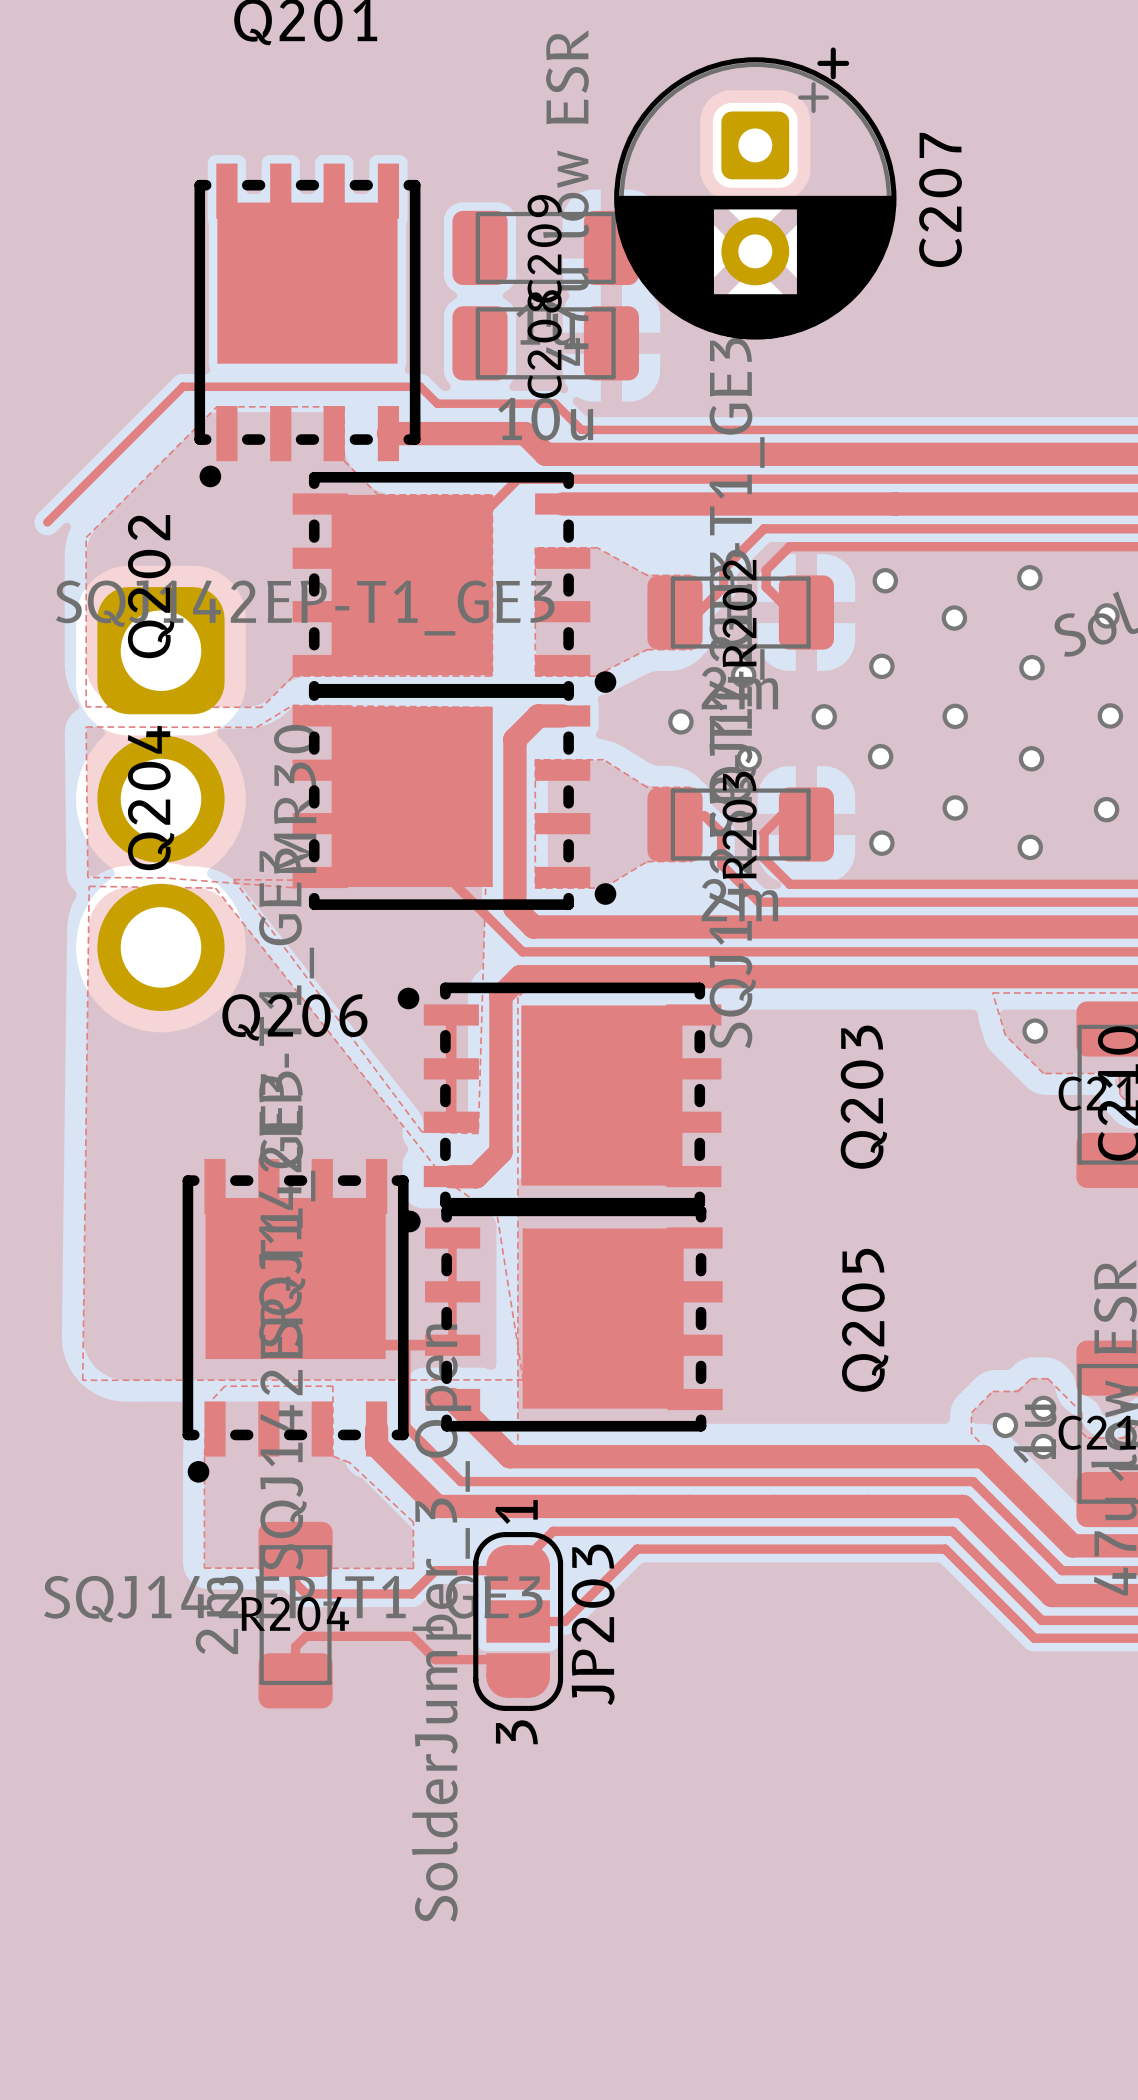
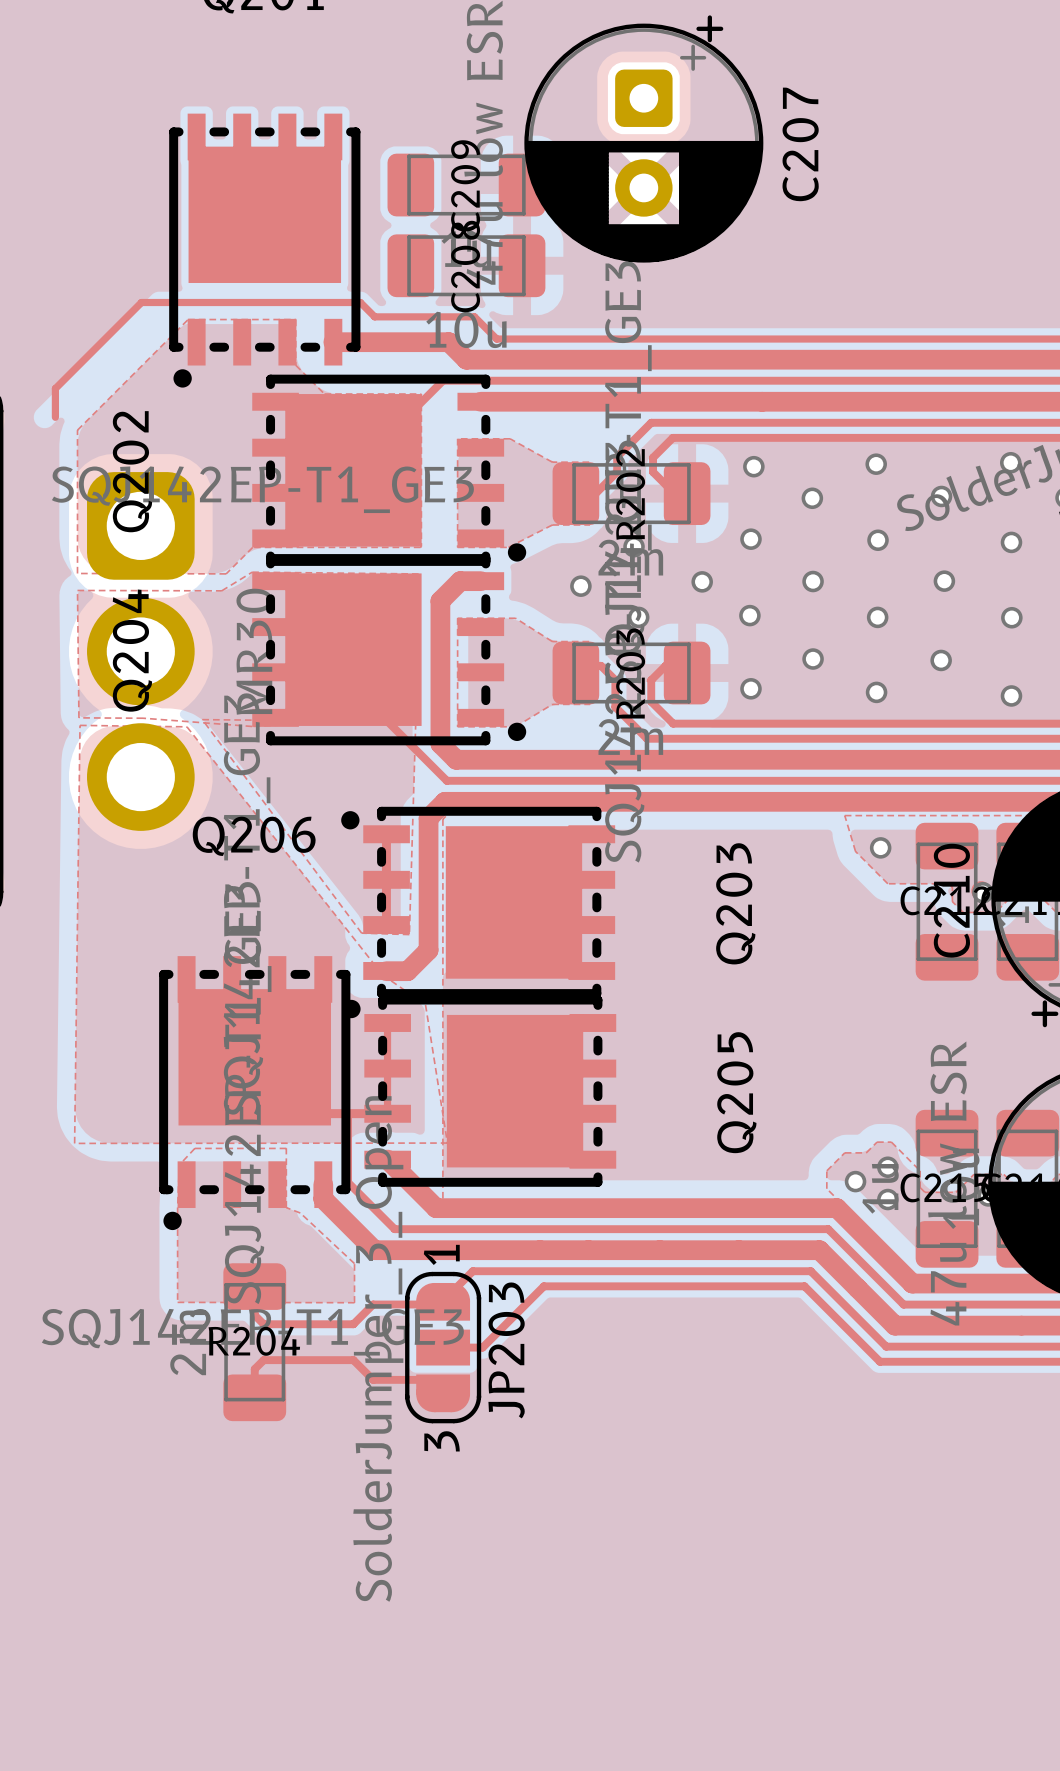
top track: (182, 386) (47, 522) -> (159, 302) (141, 302) (55, 388) (55, 417)

